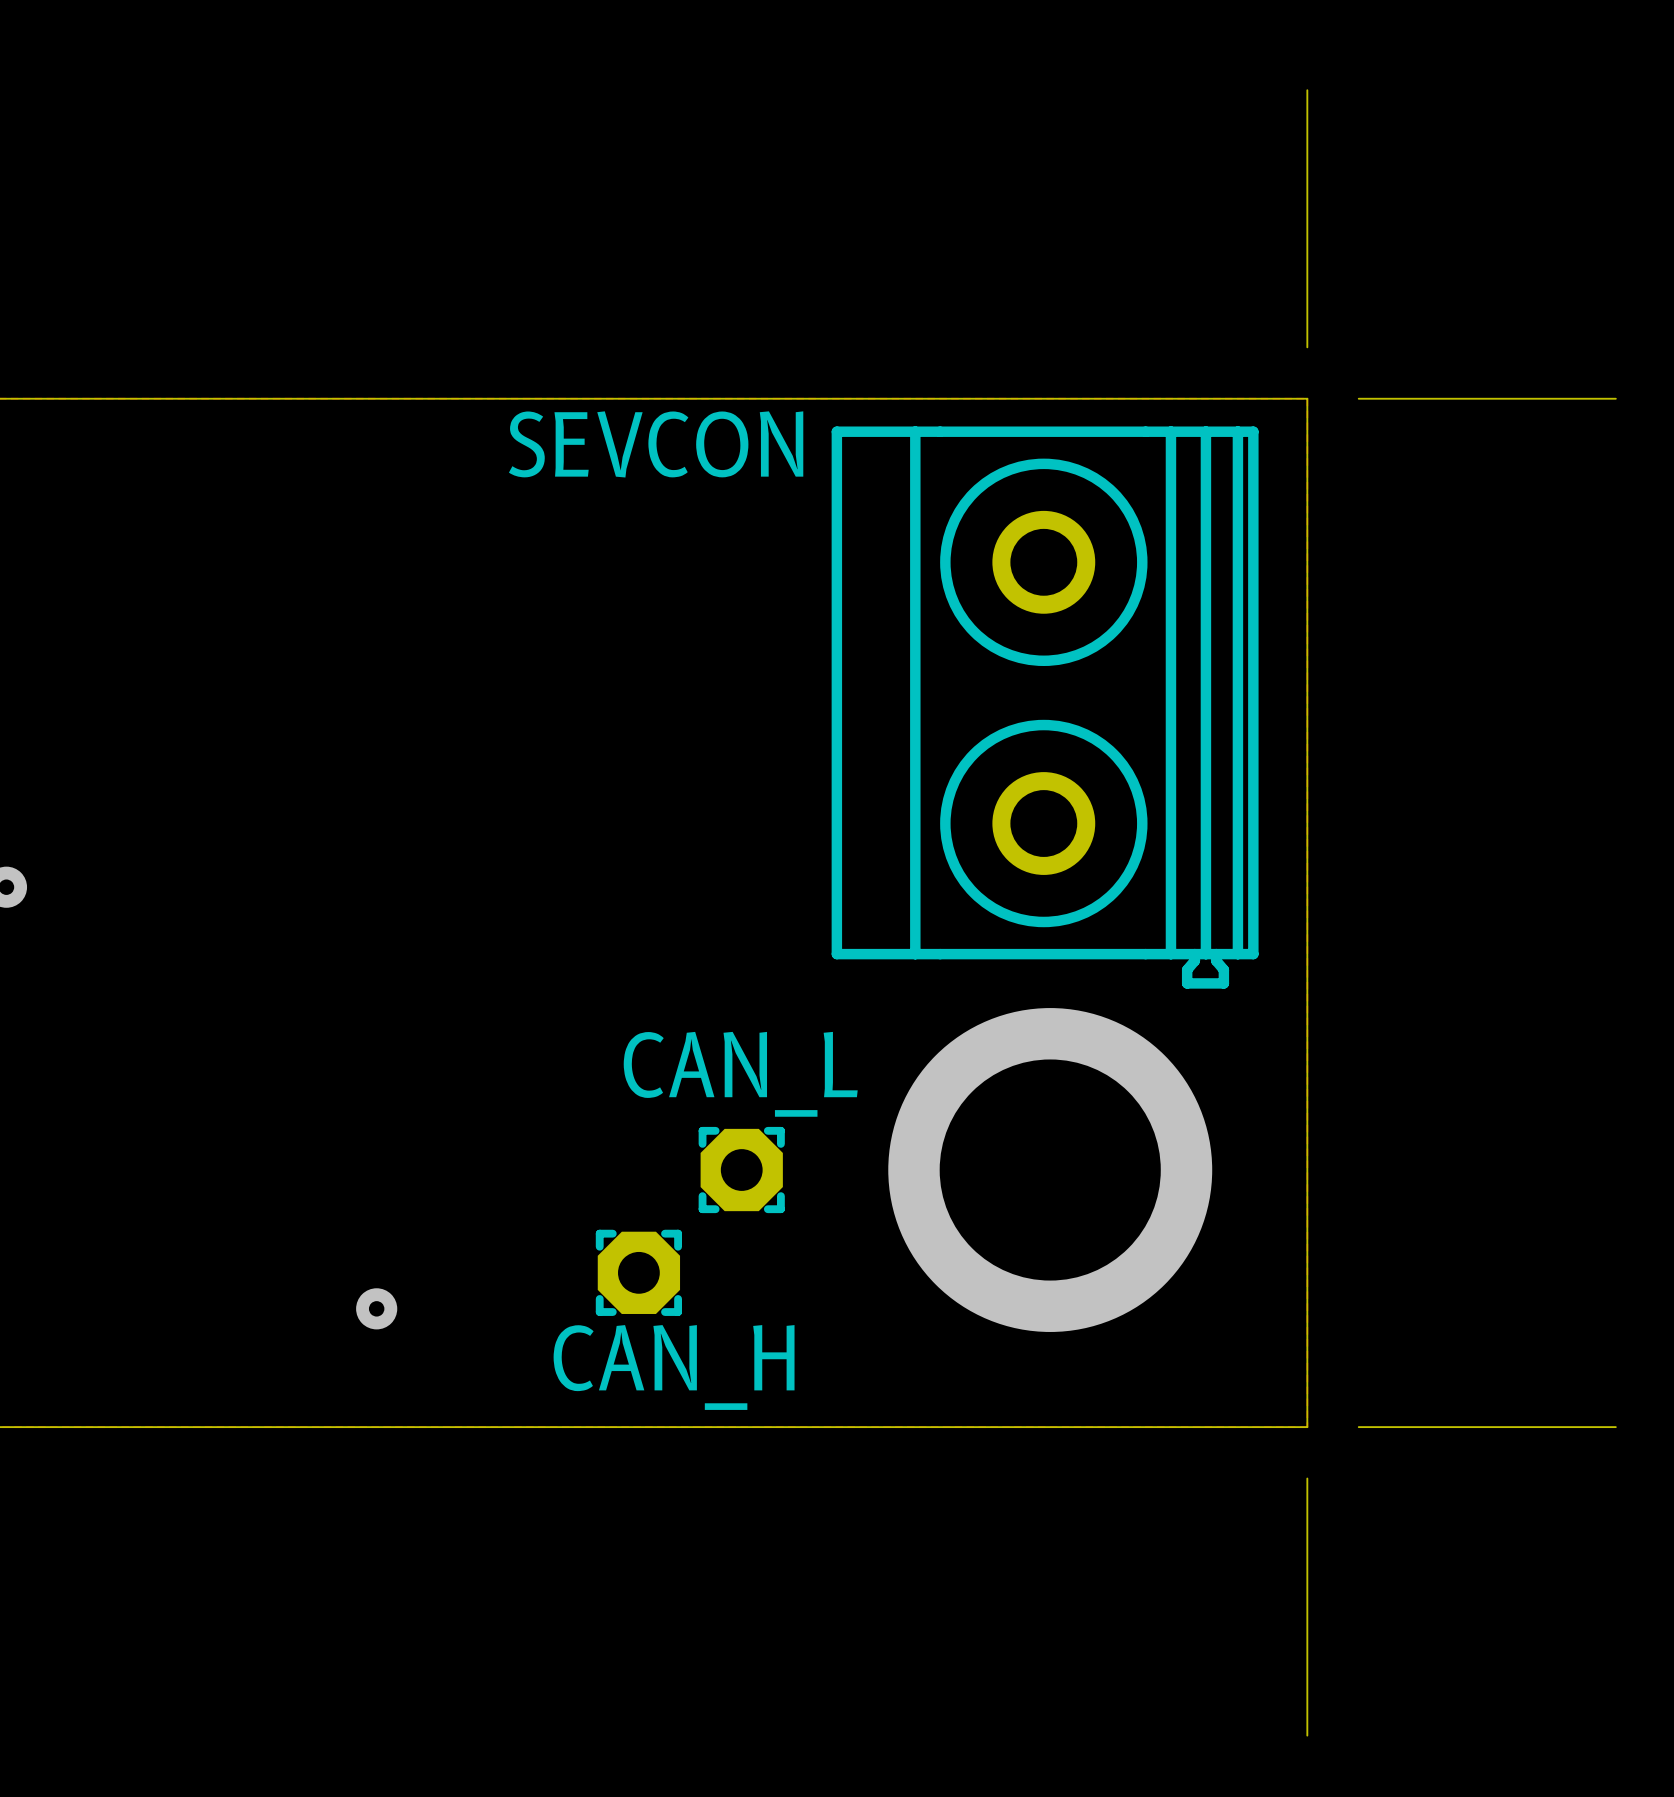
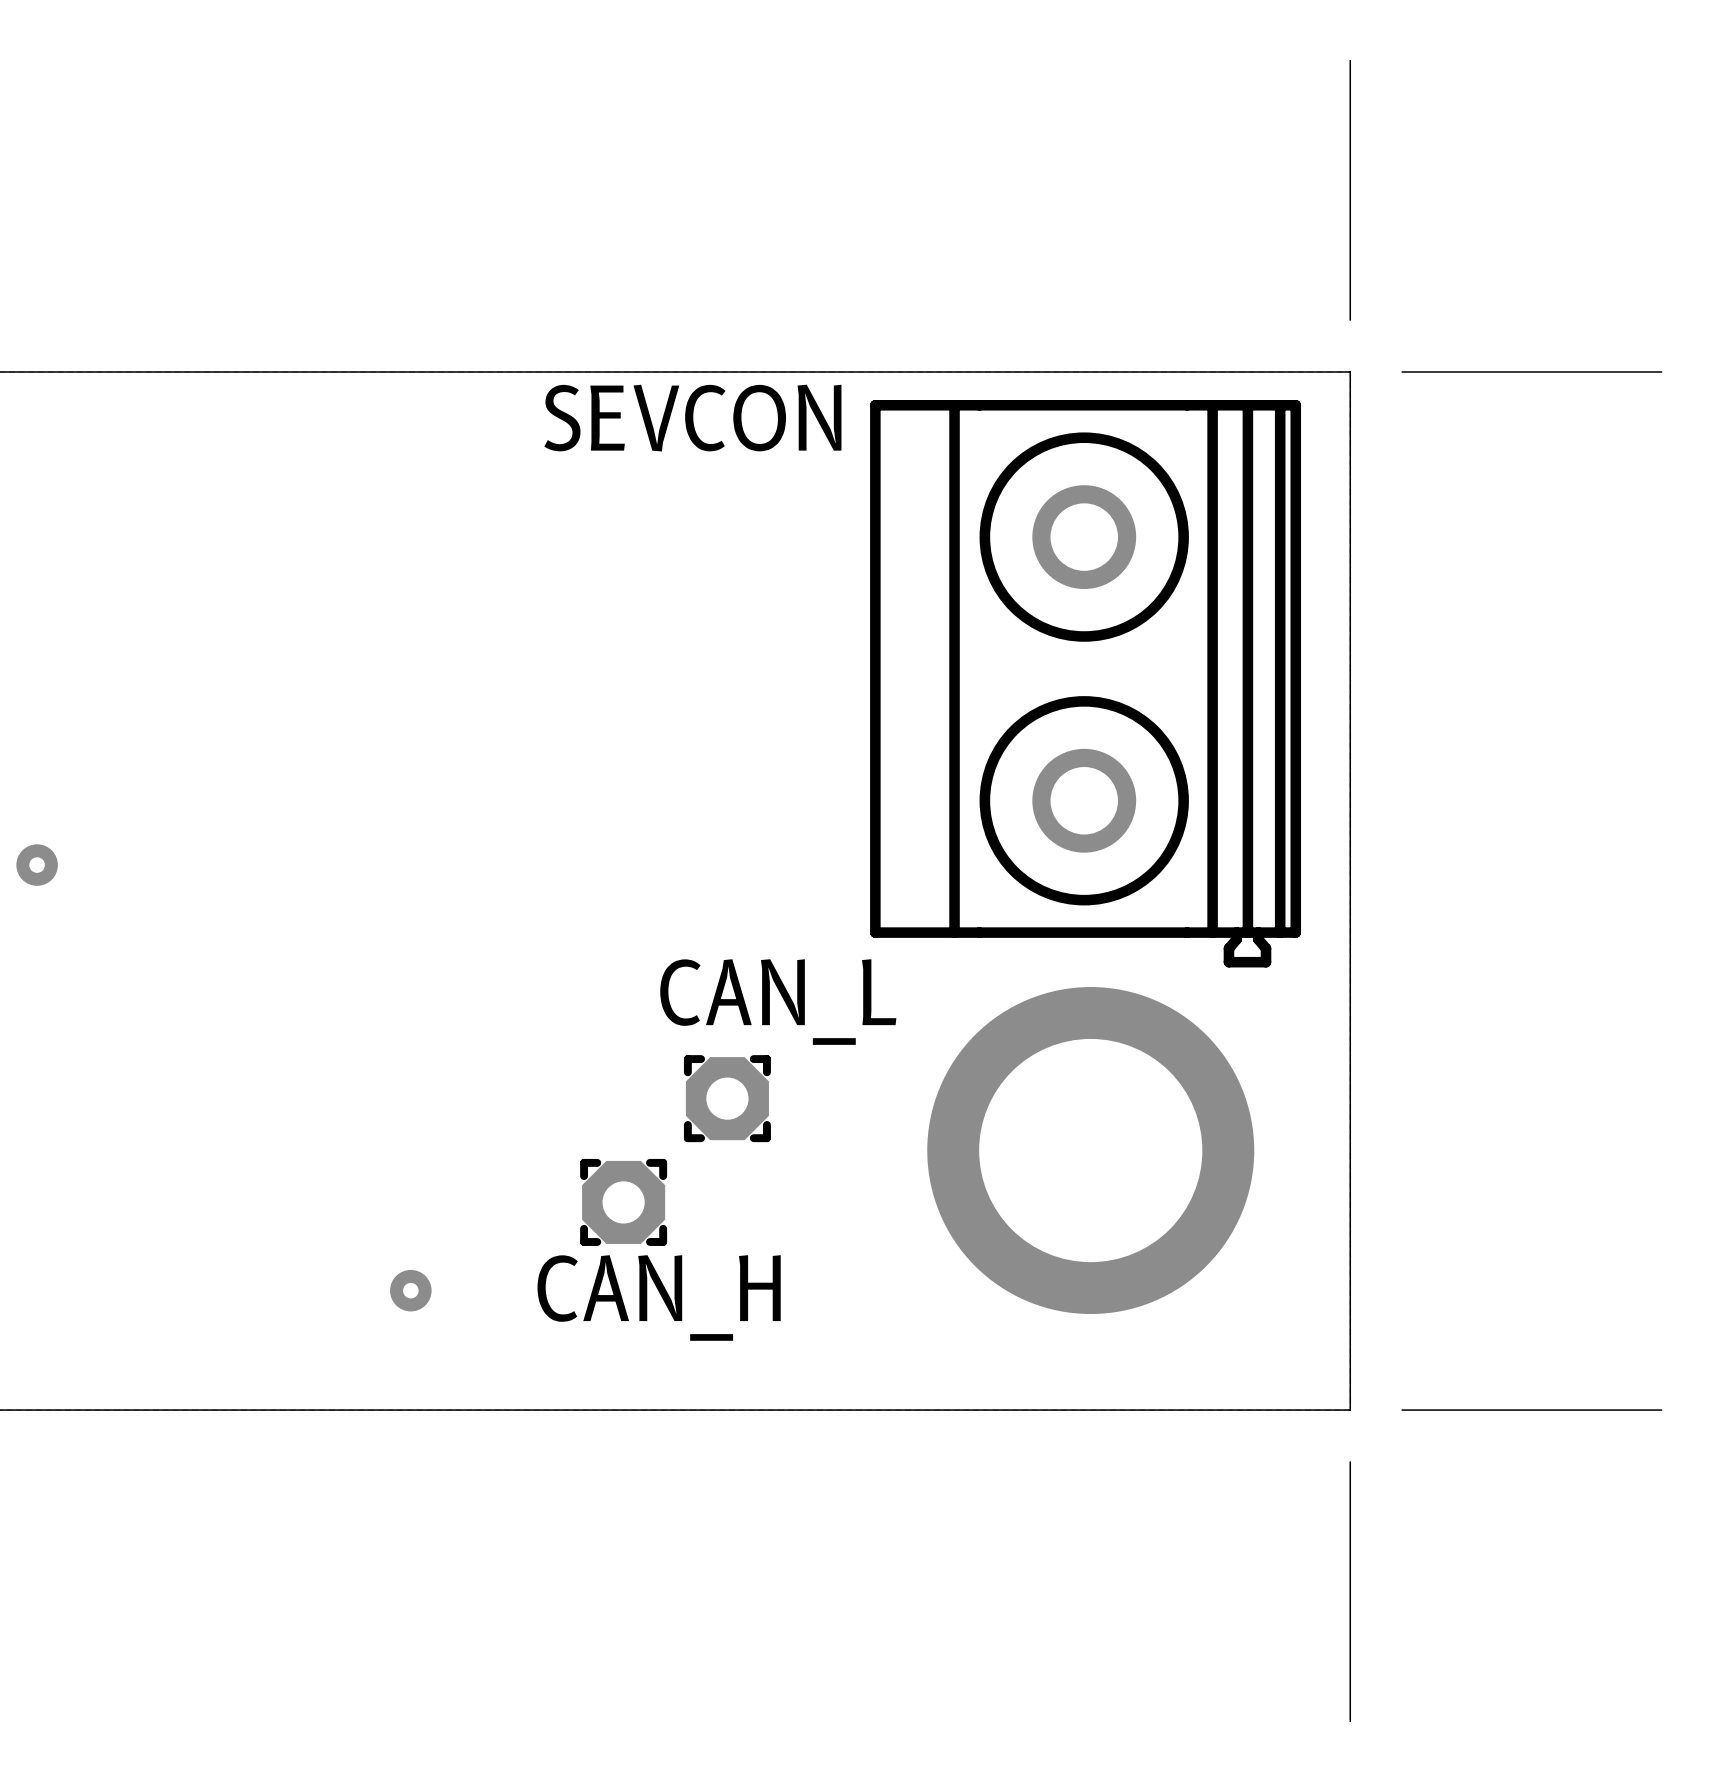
CAN_L name position: CAN_L (740, 1074) -> CAN_L (778, 1002)
CAN_L position: (741, 1170) -> (727, 1098)
CAN_H position: (638, 1272) -> (623, 1202)

